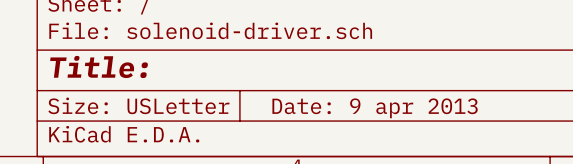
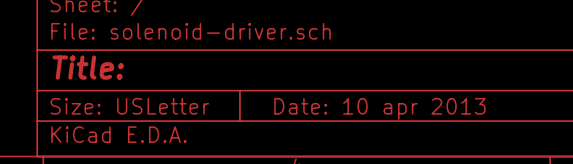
title block: Date: 9 apr 2013 (375, 108) -> Date: 10 apr 2013 (379, 108)

